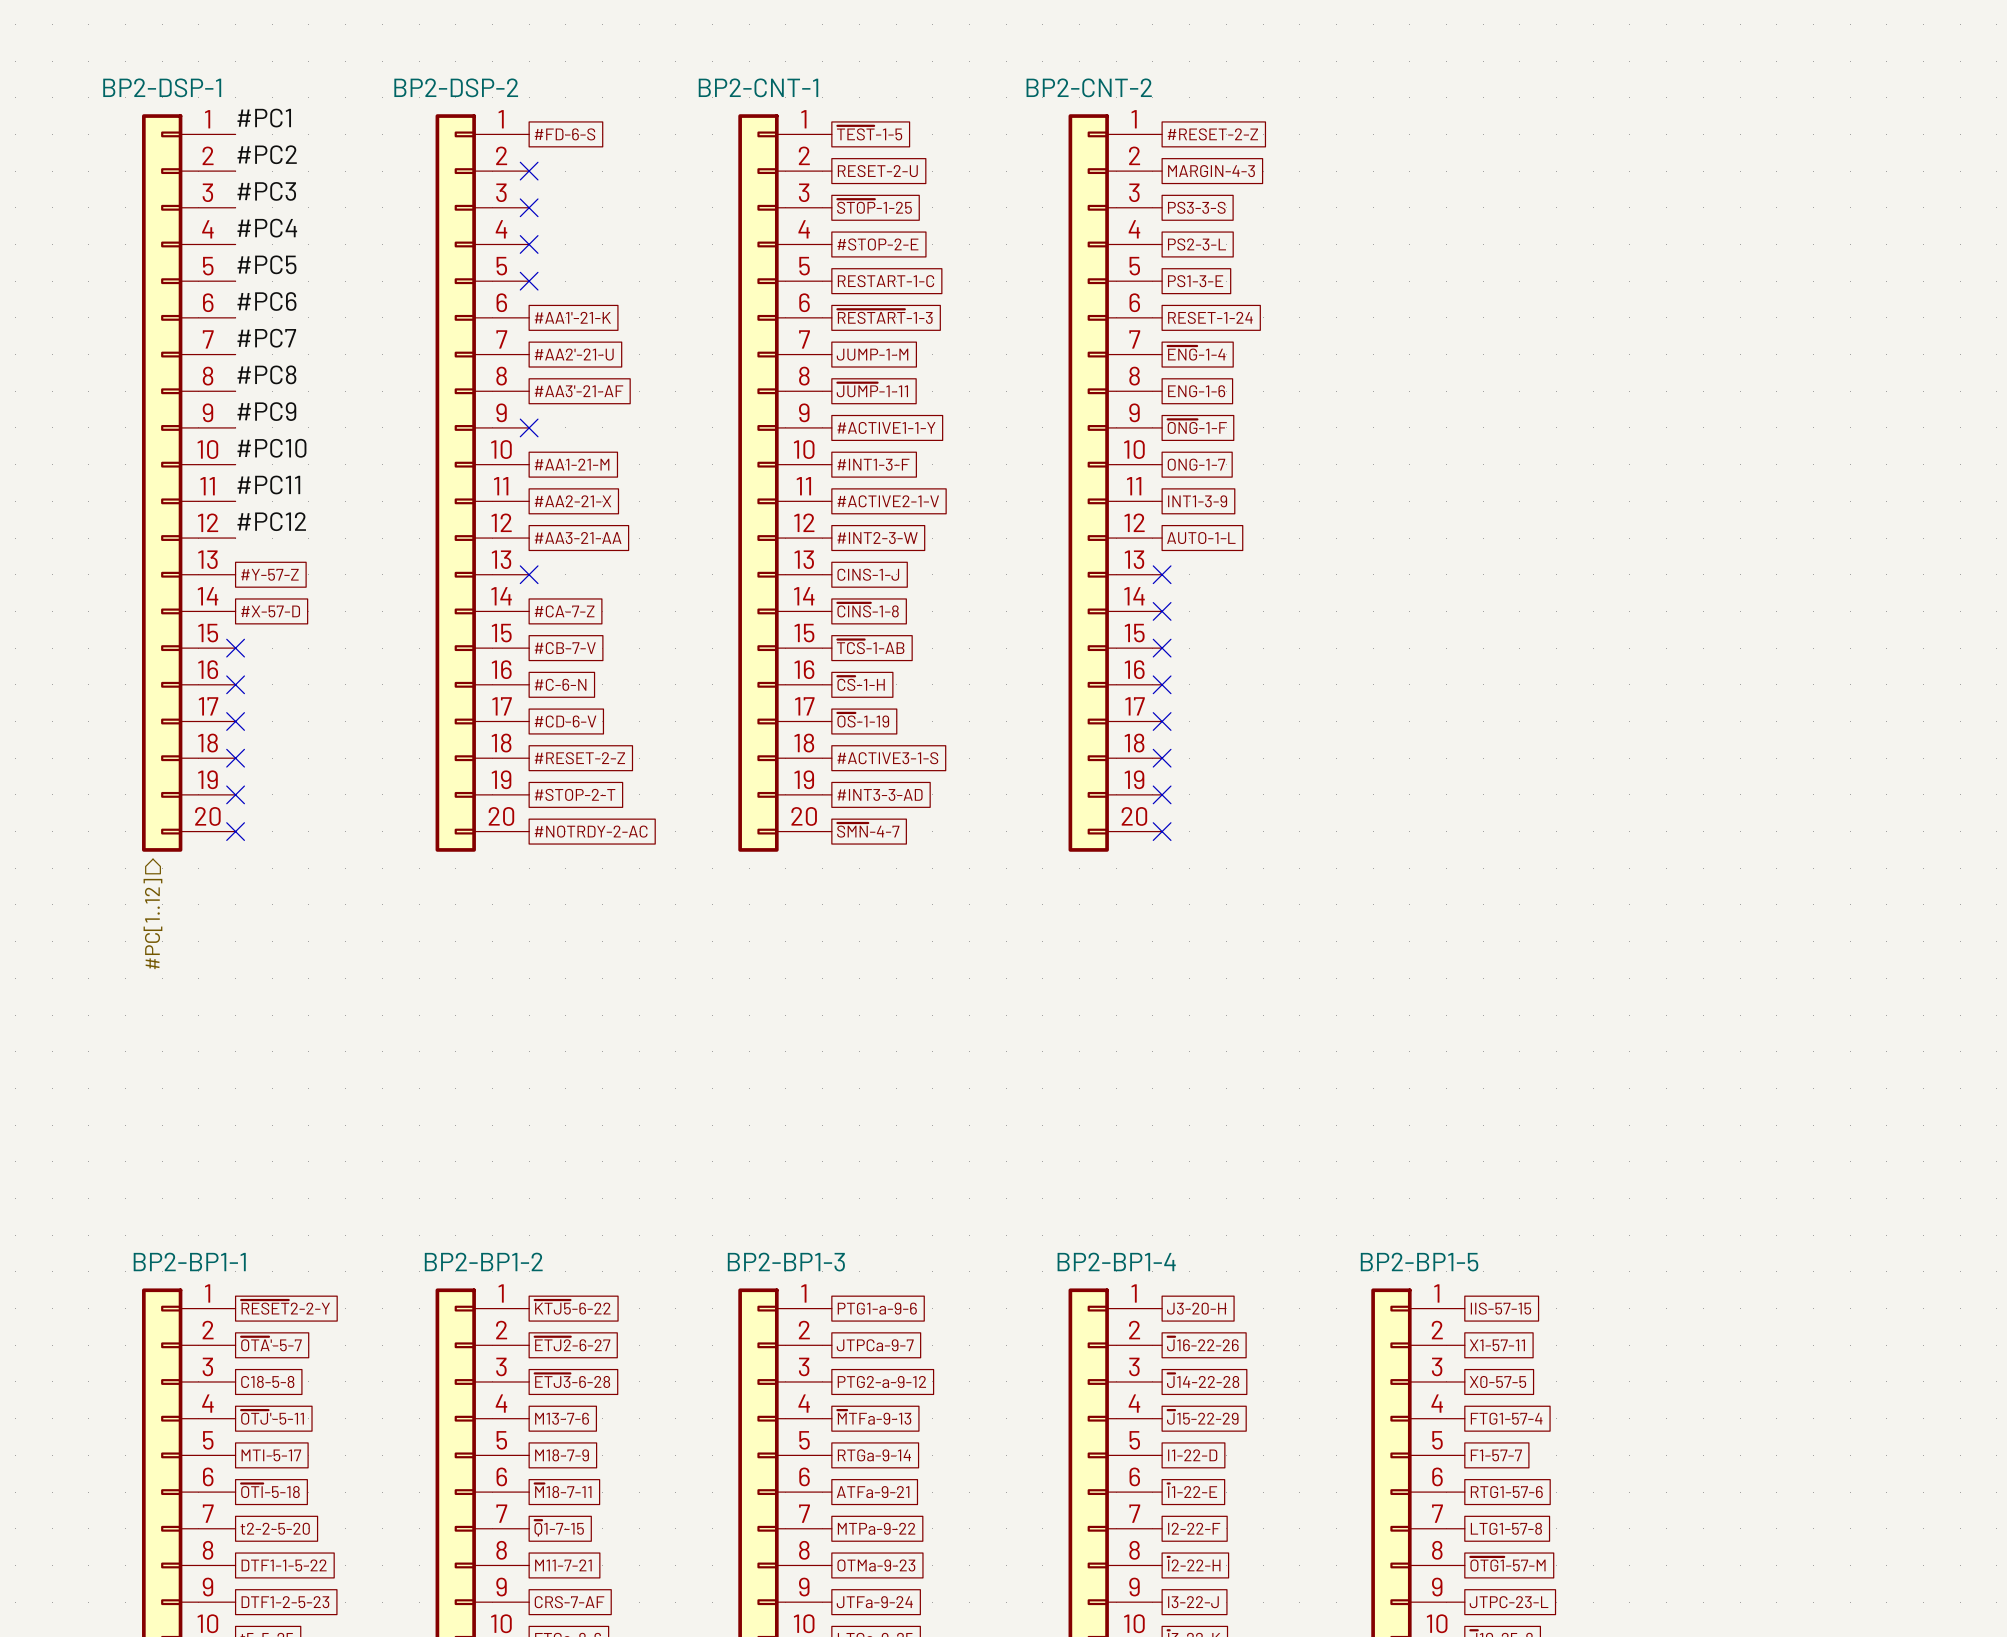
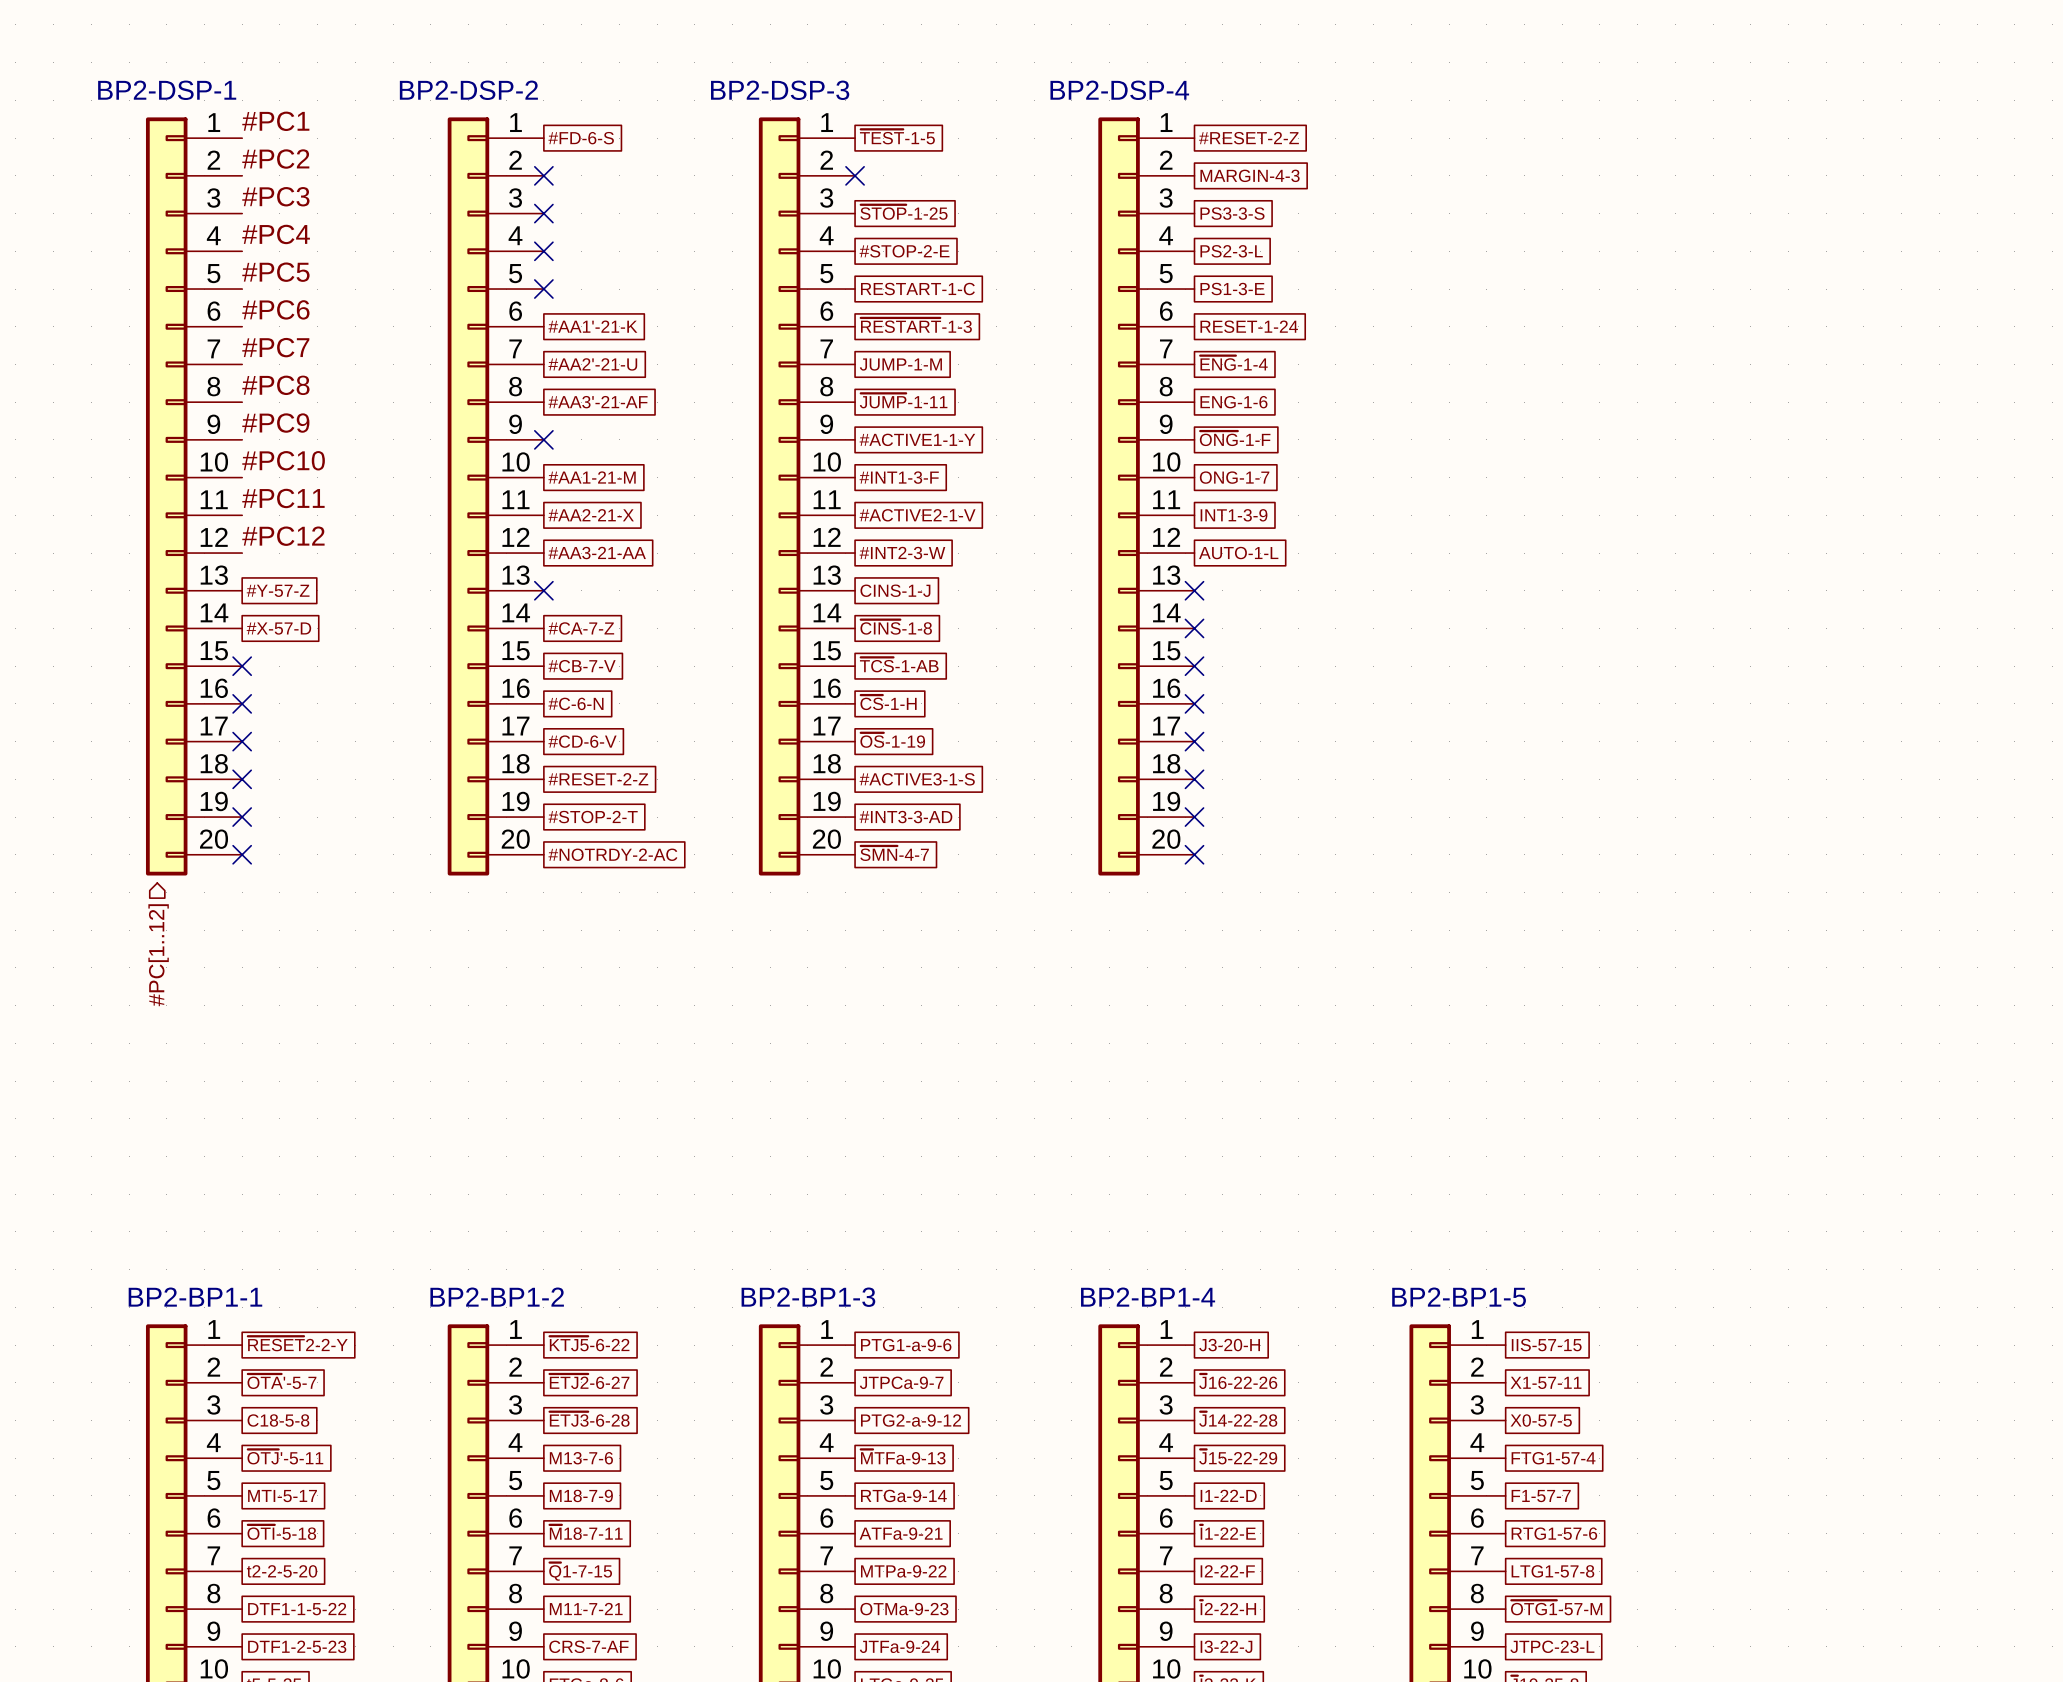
BP2-CNT-1 name: BP2-CNT-1 (758, 87) -> BP2-DSP-3 (780, 90)
BP2-CNT-2 name: BP2-CNT-2 (1089, 87) -> BP2-DSP-4 (1119, 90)
no-connect mark: none -> (855, 175)
global label: RESET-2-U (877, 171) -> none

